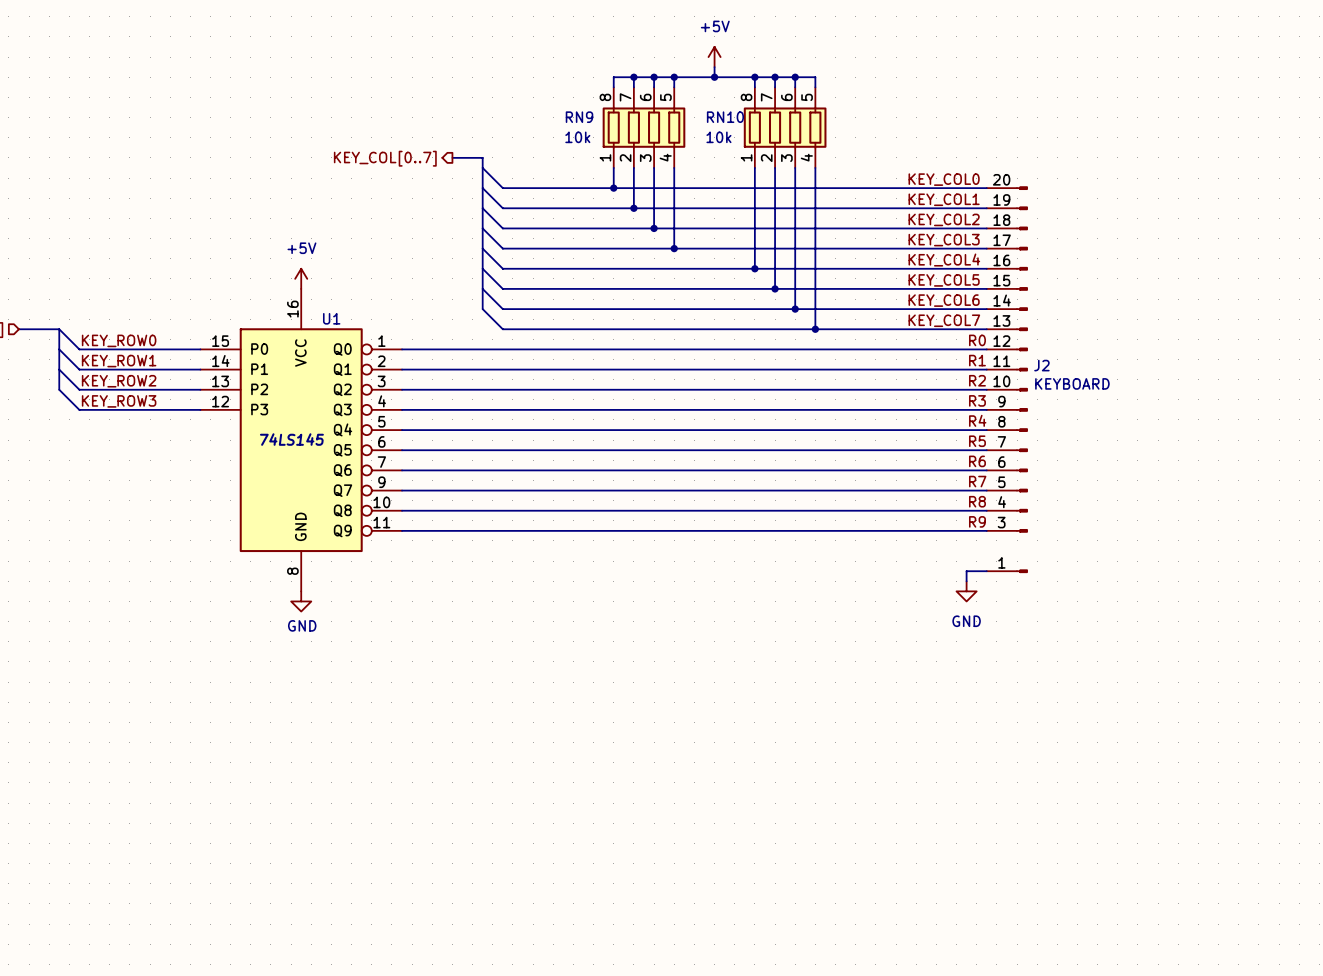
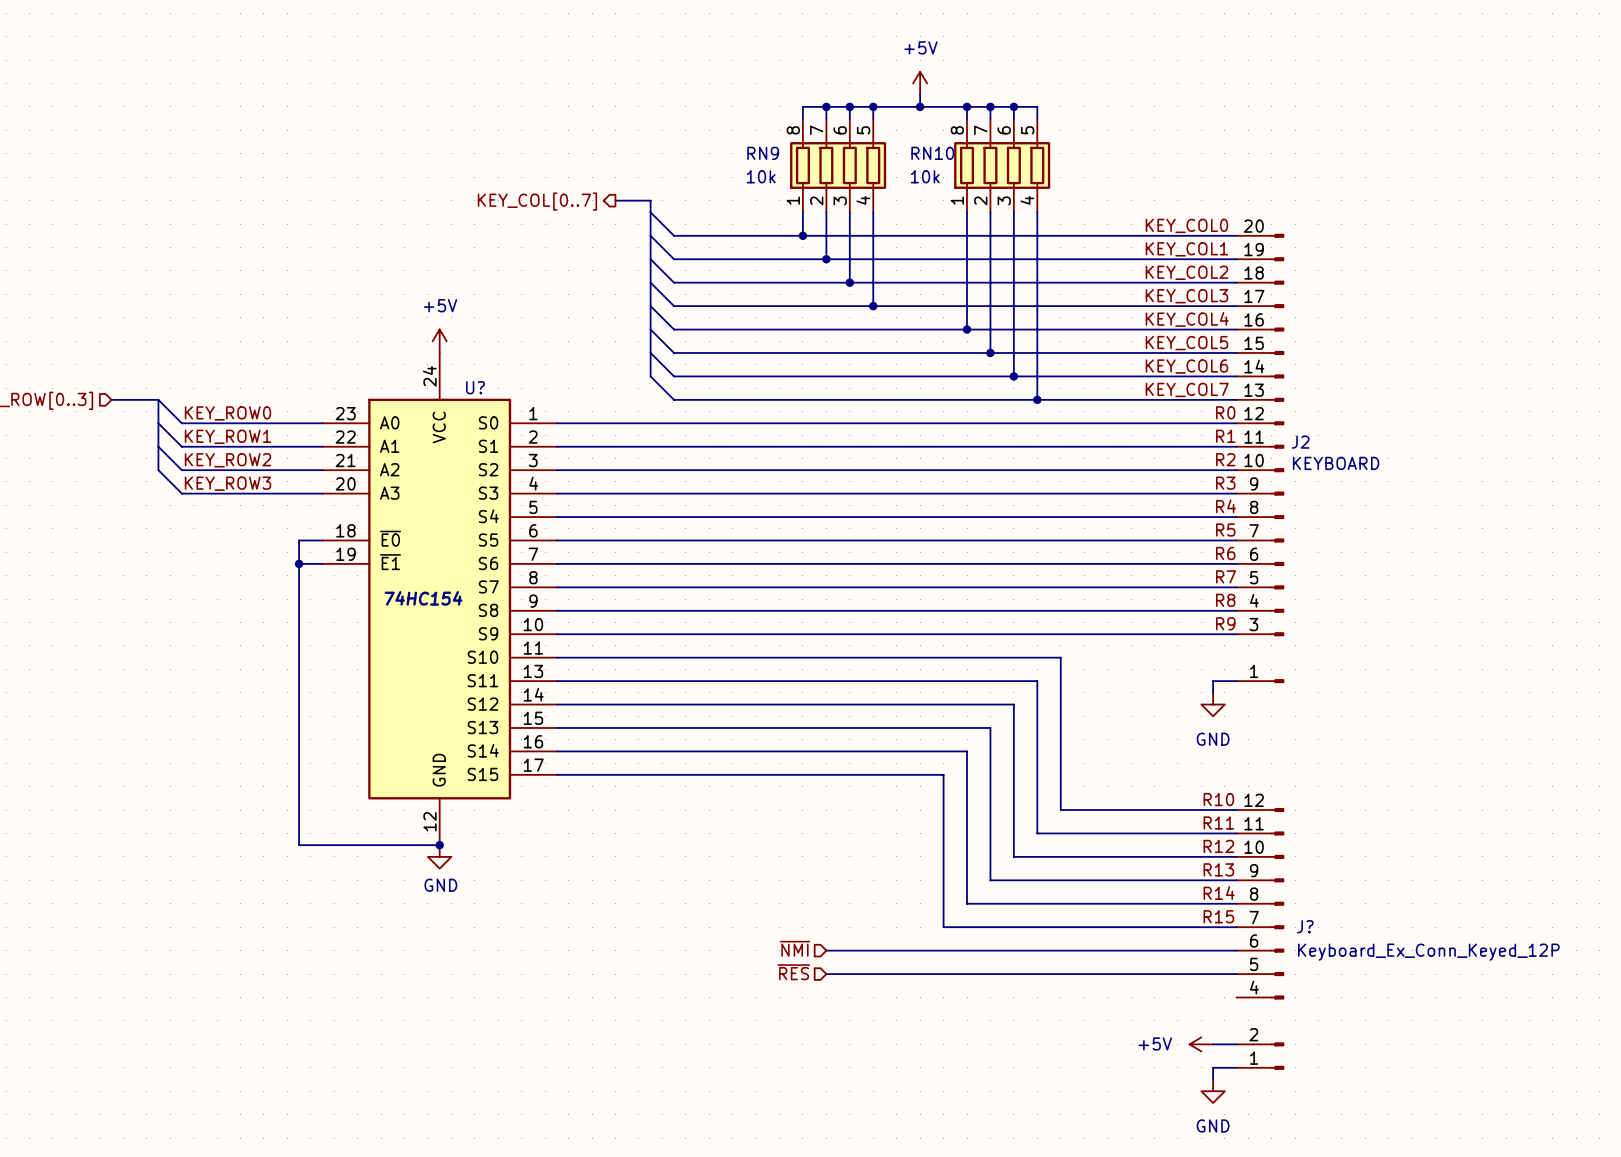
U1: 74LS145 (301, 440) -> none
wire: none -> (322, 540) (299, 540) (299, 845) (439, 845)
wire: none -> (299, 563) (322, 563)
junction: none -> (299, 563)
U?: none -> 74HC154 (439, 599)
wire: none -> (556, 657) (1060, 657) (1060, 810) (1236, 810)
wire: none -> (556, 681) (1037, 681) (1037, 833) (1236, 833)
wire: none -> (556, 704) (1013, 704) (1013, 856) (1236, 856)
power symbol position: GND (301, 601) -> GND (439, 856)
wire: none -> (556, 727) (990, 727) (990, 880) (1236, 880)
wire: none -> (556, 751) (967, 751) (967, 903) (1236, 903)
wire: none -> (556, 774) (943, 774) (943, 927) (1236, 927)
label: none -> R10 (1218, 799)
label: none -> R11 (1218, 822)
junction: none -> (439, 845)
label: none -> R12 (1218, 846)
label: none -> R13 (1218, 869)
label: none -> R14 (1219, 893)
label: none -> R15 (1218, 916)
J?: none -> Keyboard_Ex_Conn_Keyed_12P (1260, 938)
hierarchical label: none -> ~{NMI} (794, 948)
wire: none -> (826, 950) (1236, 950)
hierarchical label: none -> ~{RES} (793, 972)
wire: none -> (826, 974) (1236, 974)
power symbol: none -> +5V (1201, 1044)
wire: none -> (1213, 1044) (1236, 1044)
wire: none -> (1236, 1067) (1213, 1067) (1213, 1079)
power symbol: none -> GND (1213, 1091)

